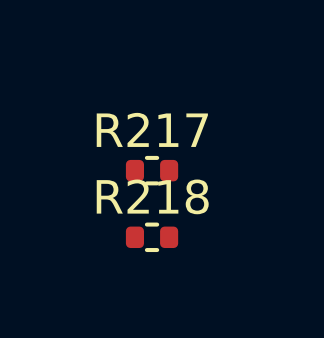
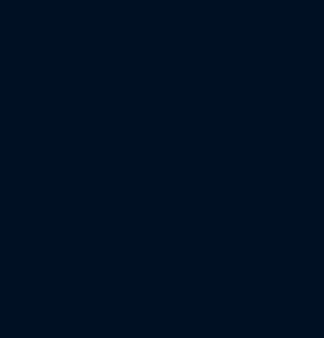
R217: (152, 170) -> none
R218: (152, 237) -> none

